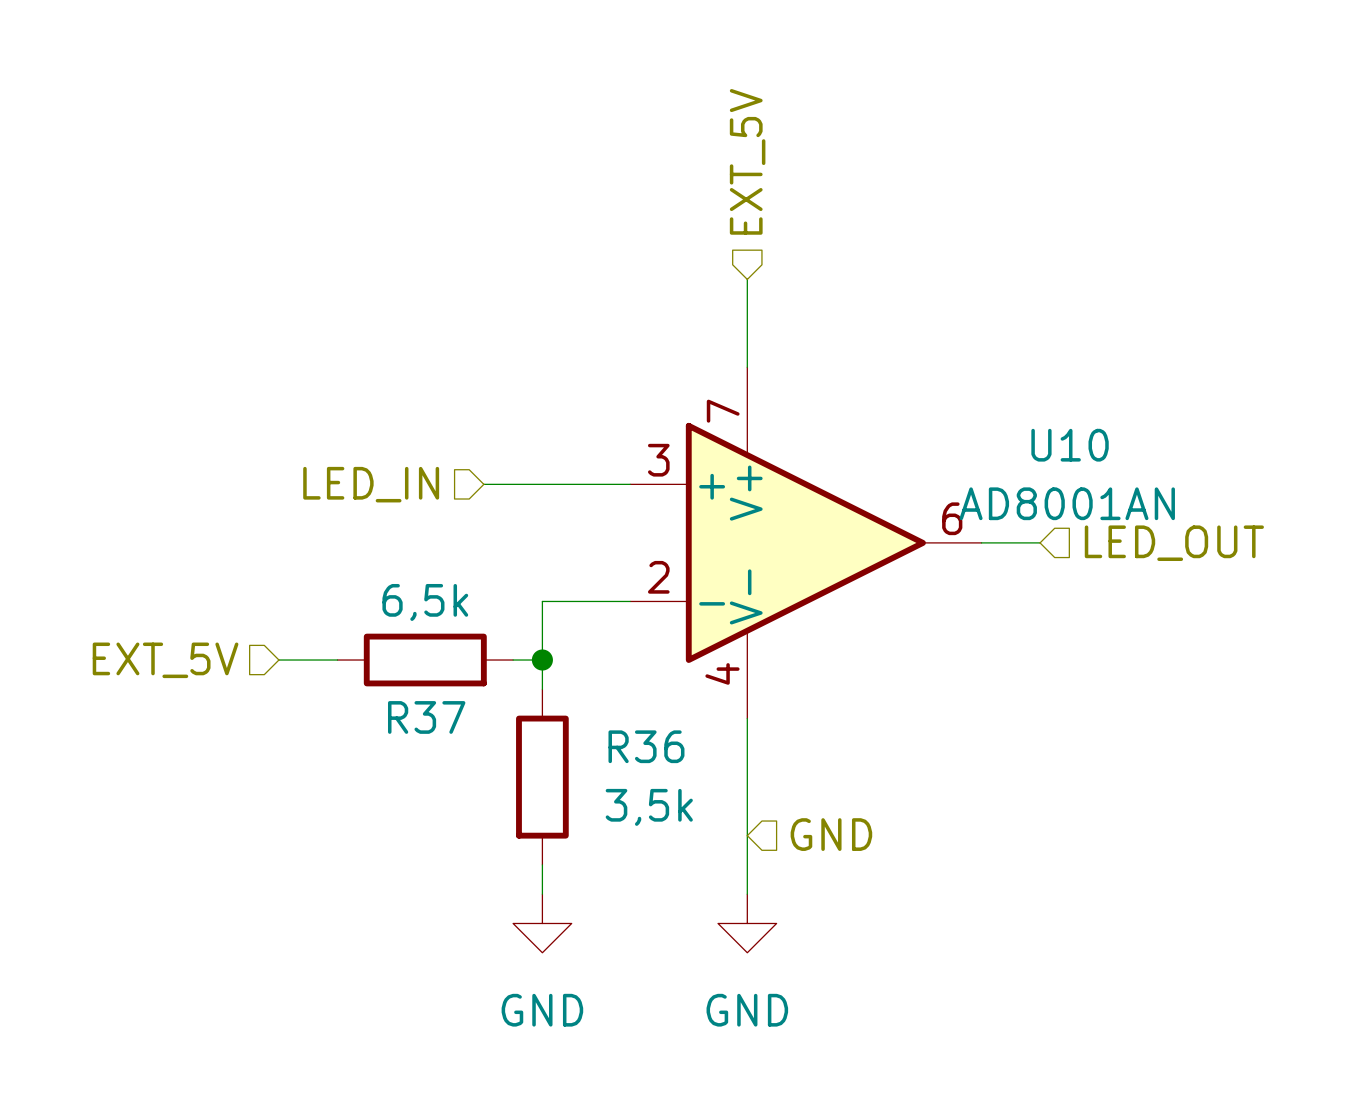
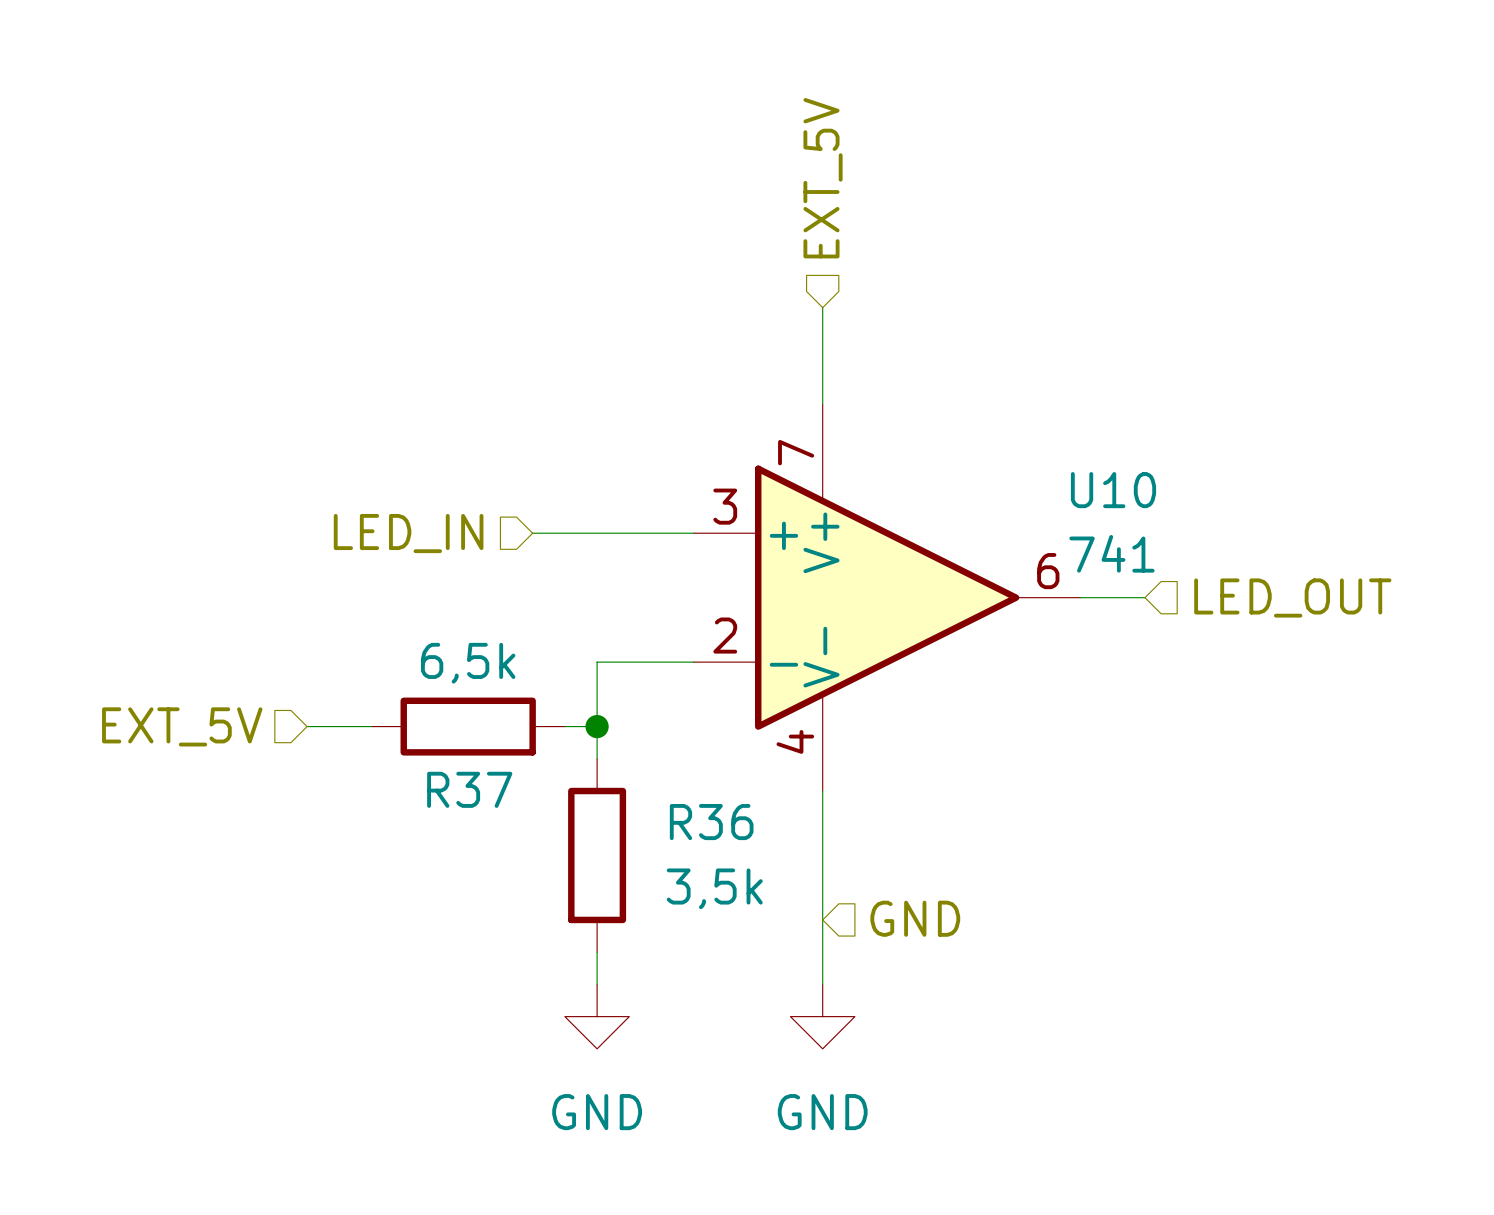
U10 name position: U10 (1070, 445) -> U10 (1113, 490)
U10 value: AD8001AN (1067, 503) -> 741 (1111, 553)

